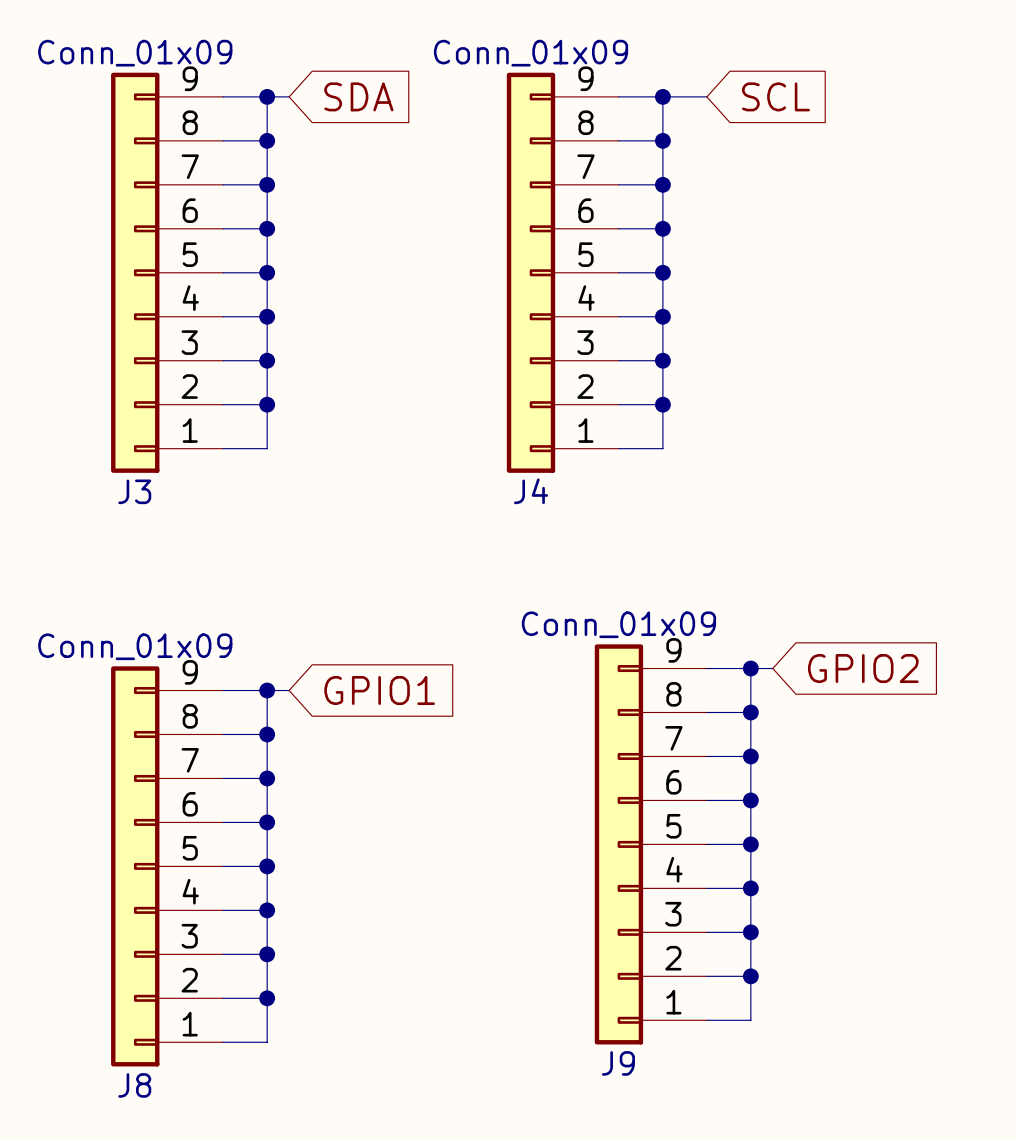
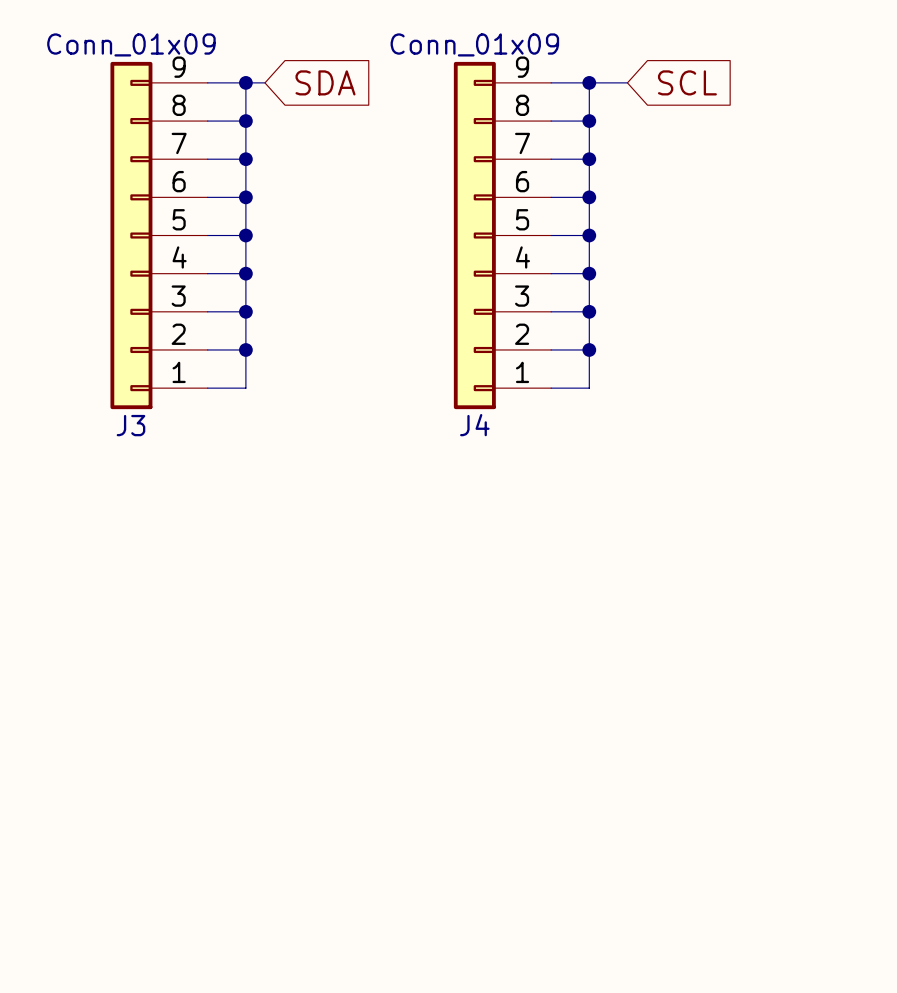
wire: (706, 668) (772, 668) -> none
wire: (750, 668) (750, 1020) (706, 1020) -> none
junction: (750, 668) -> none
global label: GPIO2 (863, 668) -> none
wire: (223, 690) (289, 690) -> none
wire: (267, 690) (267, 1042) (223, 1042) -> none
junction: (267, 690) -> none
global label: GPIO1 (379, 690) -> none
wire: (706, 712) (750, 712) -> none
junction: (750, 712) -> none
wire: (223, 734) (267, 734) -> none
junction: (267, 734) -> none
wire: (706, 756) (750, 756) -> none
junction: (750, 756) -> none
wire: (223, 778) (267, 778) -> none
junction: (267, 778) -> none
wire: (706, 800) (750, 800) -> none
junction: (750, 800) -> none
wire: (223, 822) (267, 822) -> none
junction: (267, 822) -> none
J9: Conn_01x09 (650, 844) -> none
wire: (706, 844) (750, 844) -> none
junction: (750, 844) -> none
J8: Conn_01x09 (167, 866) -> none
wire: (223, 866) (267, 866) -> none
junction: (267, 866) -> none
wire: (706, 888) (750, 888) -> none
junction: (750, 888) -> none
wire: (223, 910) (267, 910) -> none
junction: (267, 910) -> none
wire: (706, 932) (750, 932) -> none
junction: (750, 932) -> none
wire: (223, 954) (267, 954) -> none
junction: (267, 954) -> none
wire: (706, 976) (750, 976) -> none
junction: (750, 976) -> none
wire: (223, 998) (267, 998) -> none
junction: (267, 998) -> none

